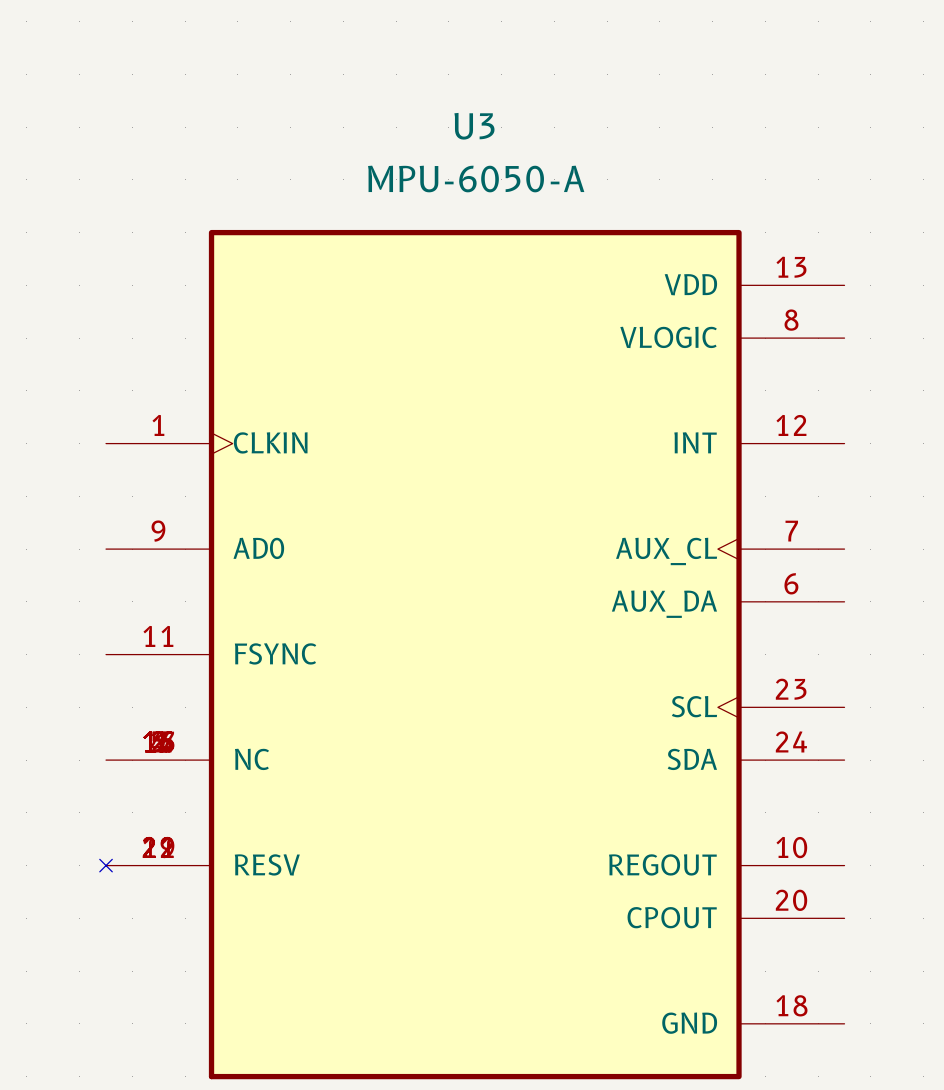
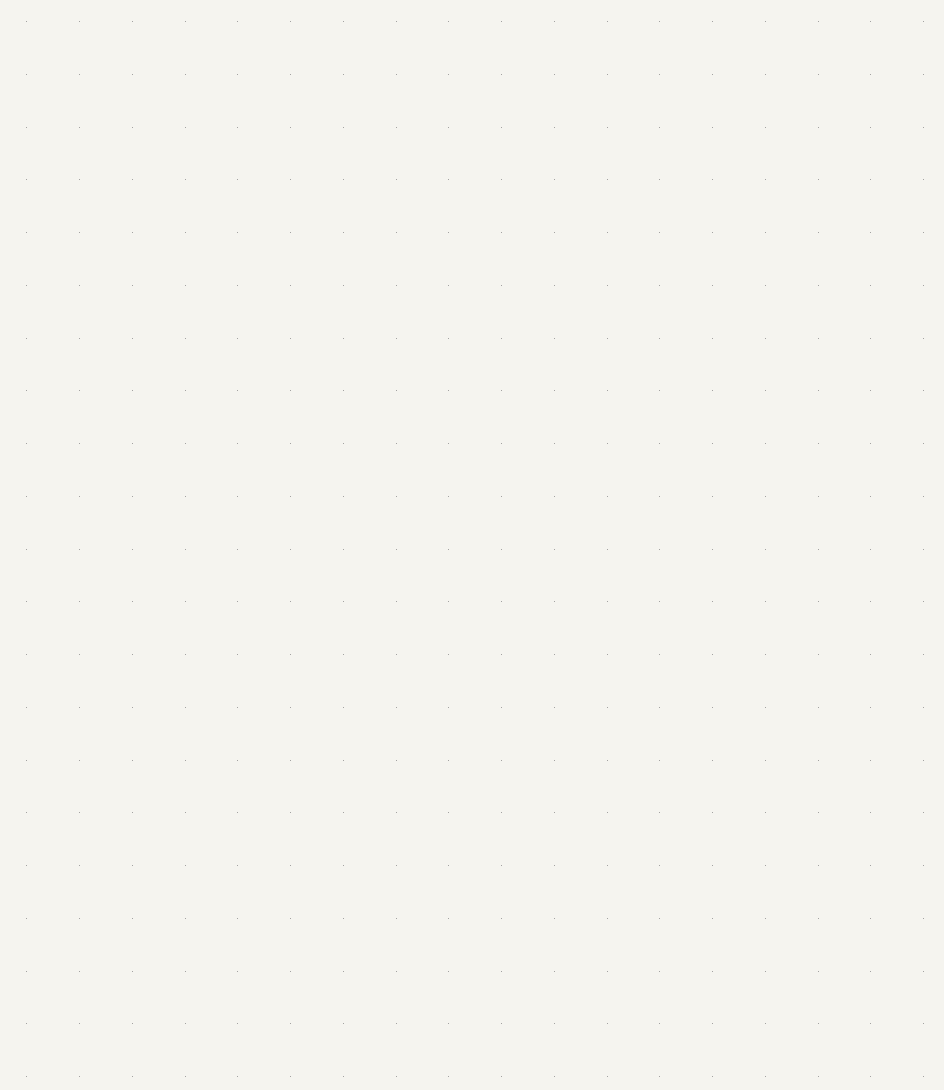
U3: MPU-6050-A (472, 654) -> none

